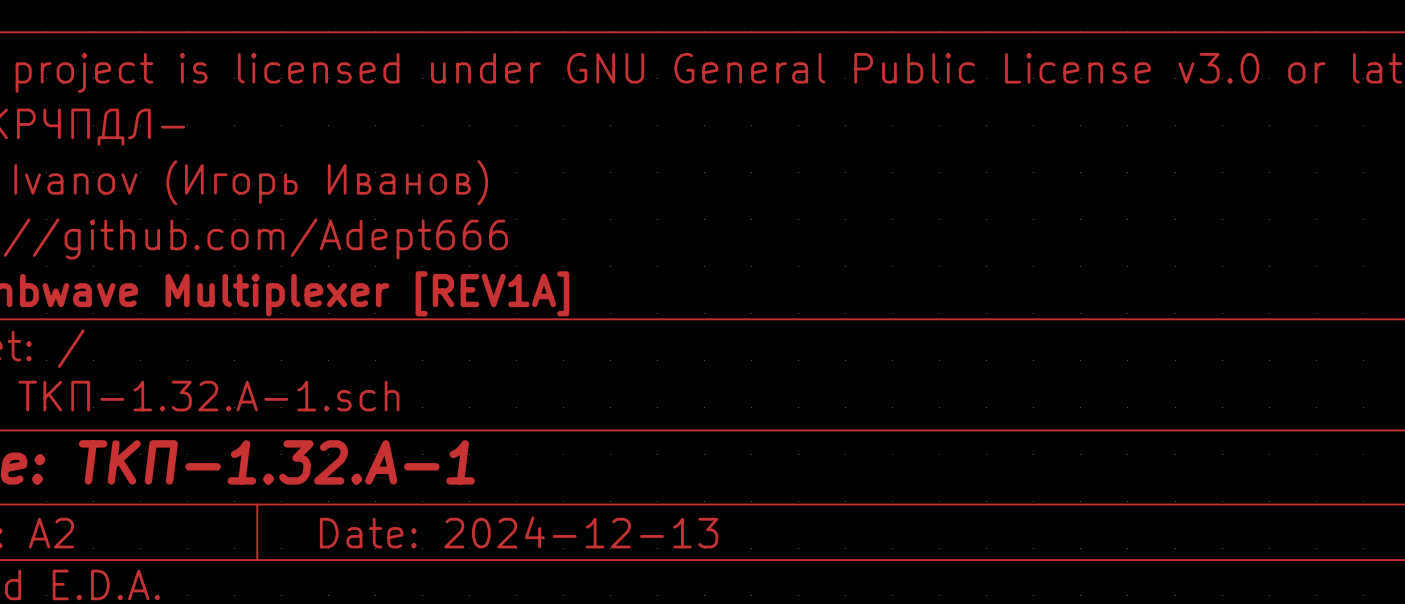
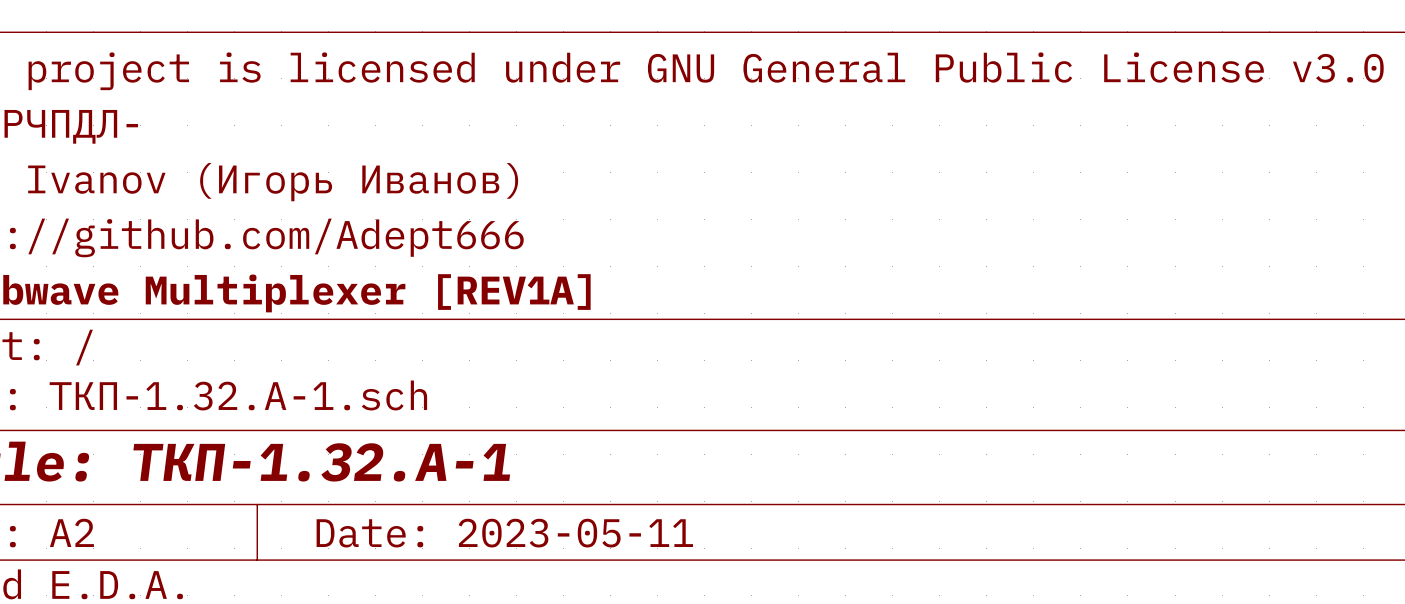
title block: Date: 2024-12-13 (519, 532) -> Date: 2023-05-11 (504, 533)

